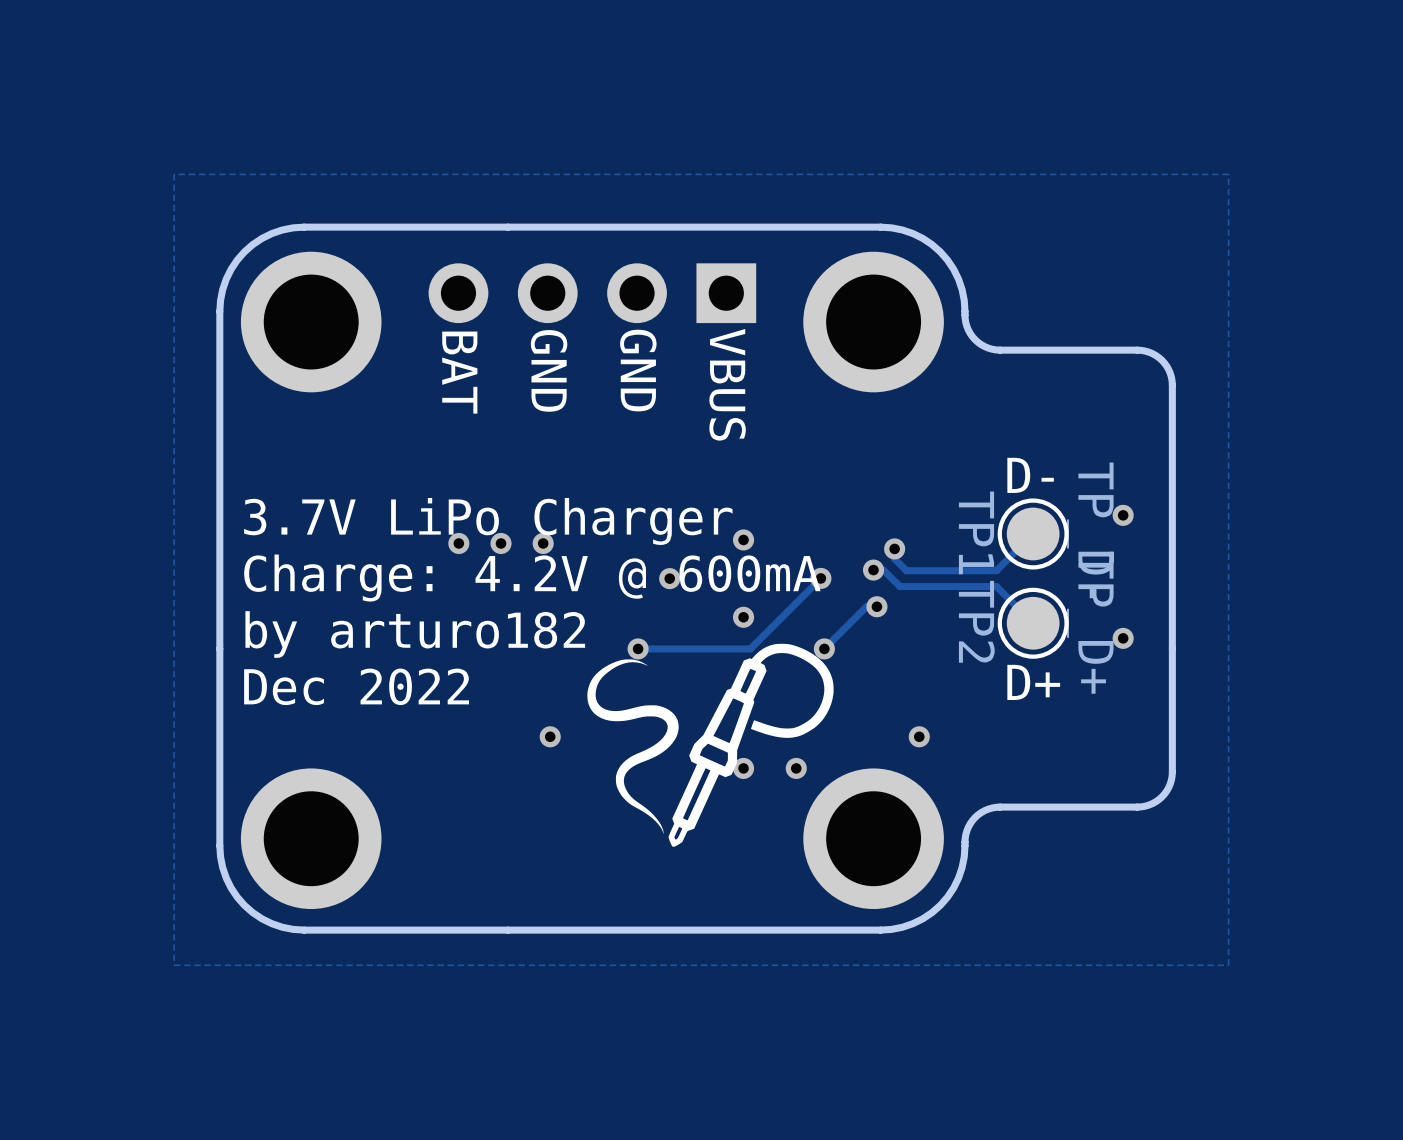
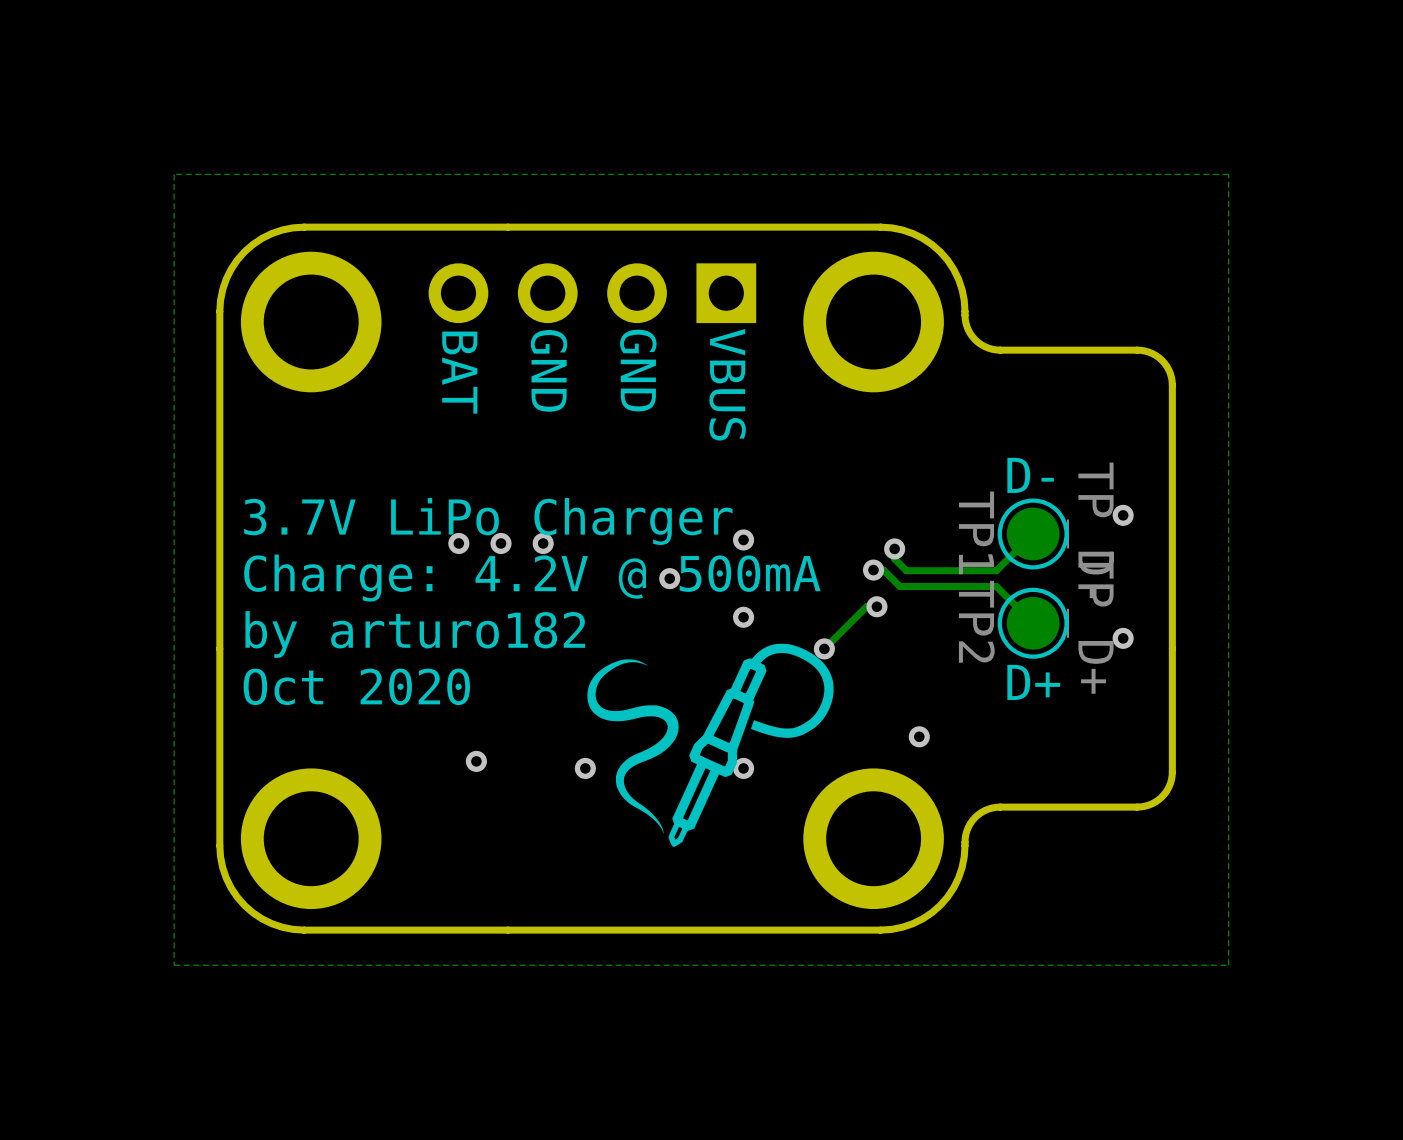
text: Charge: 4.2V @ 600mA (532, 578) -> Charge: 4.2V @ 500mA (532, 578)
track: (820, 578) (750, 648) (638, 648) -> none
via: (820, 578) -> none
via: (638, 648) -> none
text: Dec 2022 (356, 686) -> Oct 2020 (356, 686)
via: (550, 736) -> none
via: none -> (476, 761)
via: none -> (585, 768)
via: (796, 768) -> none

